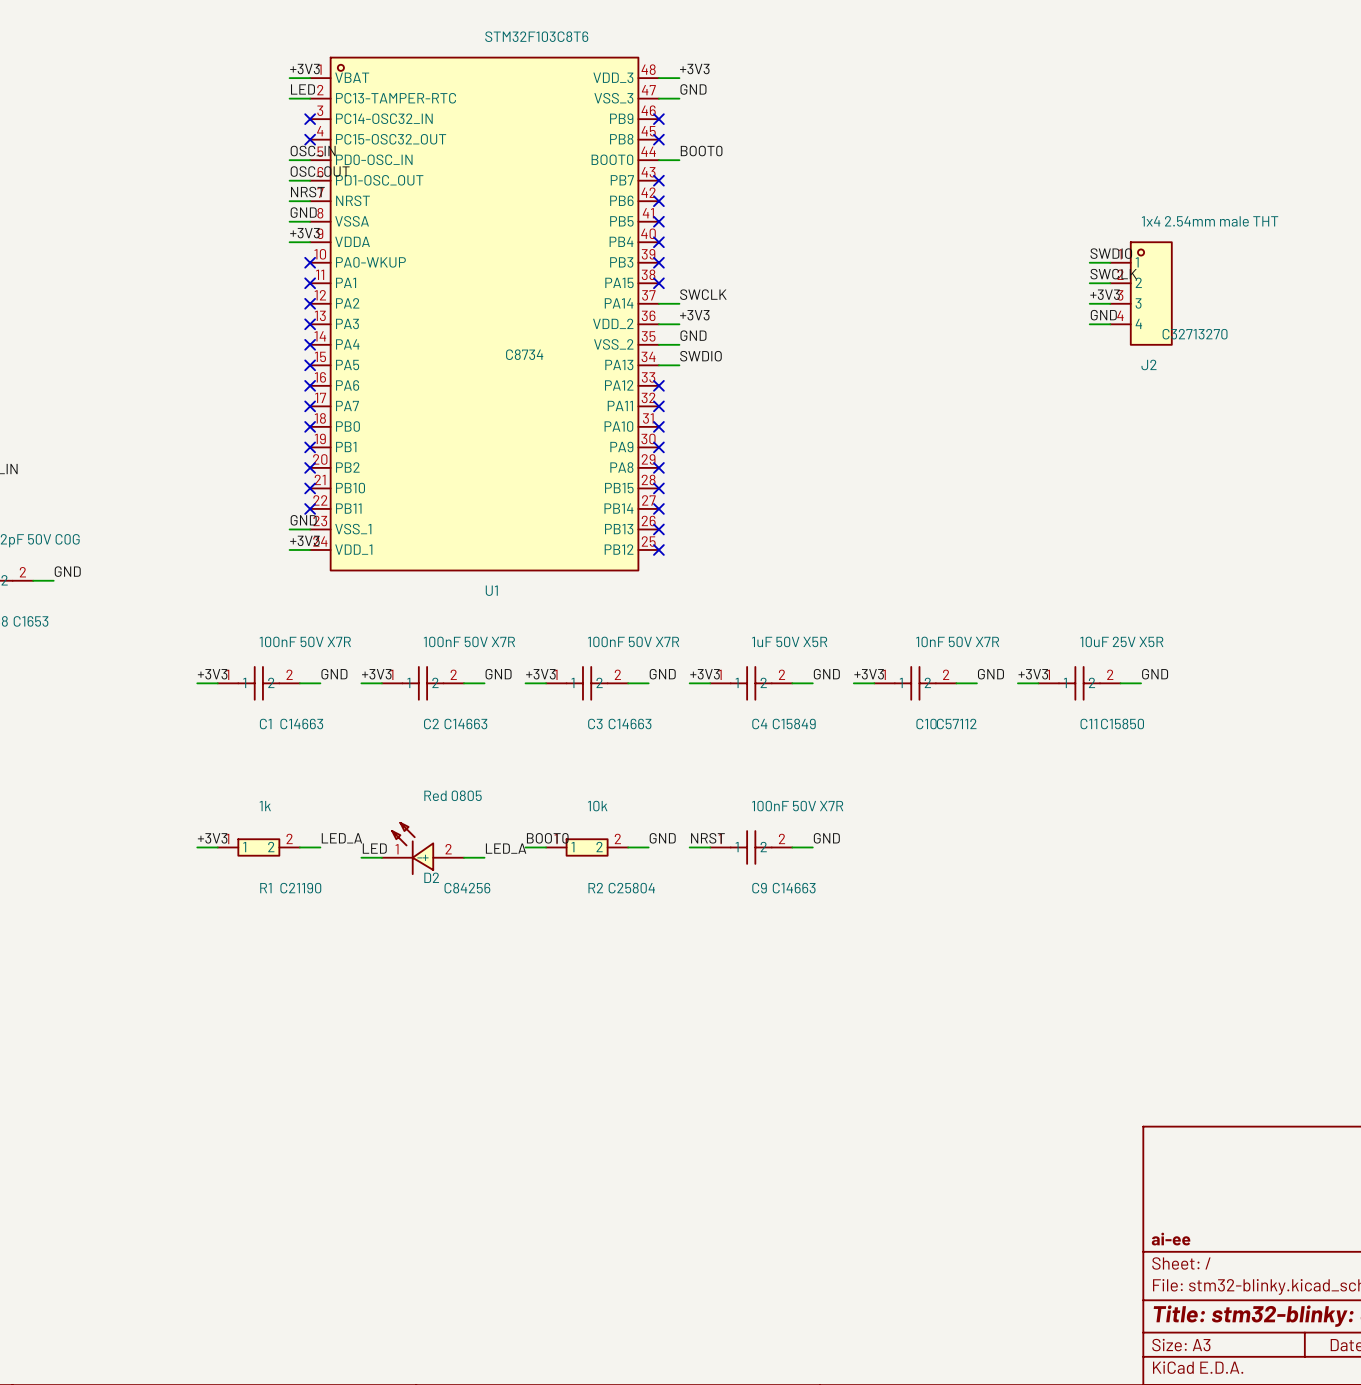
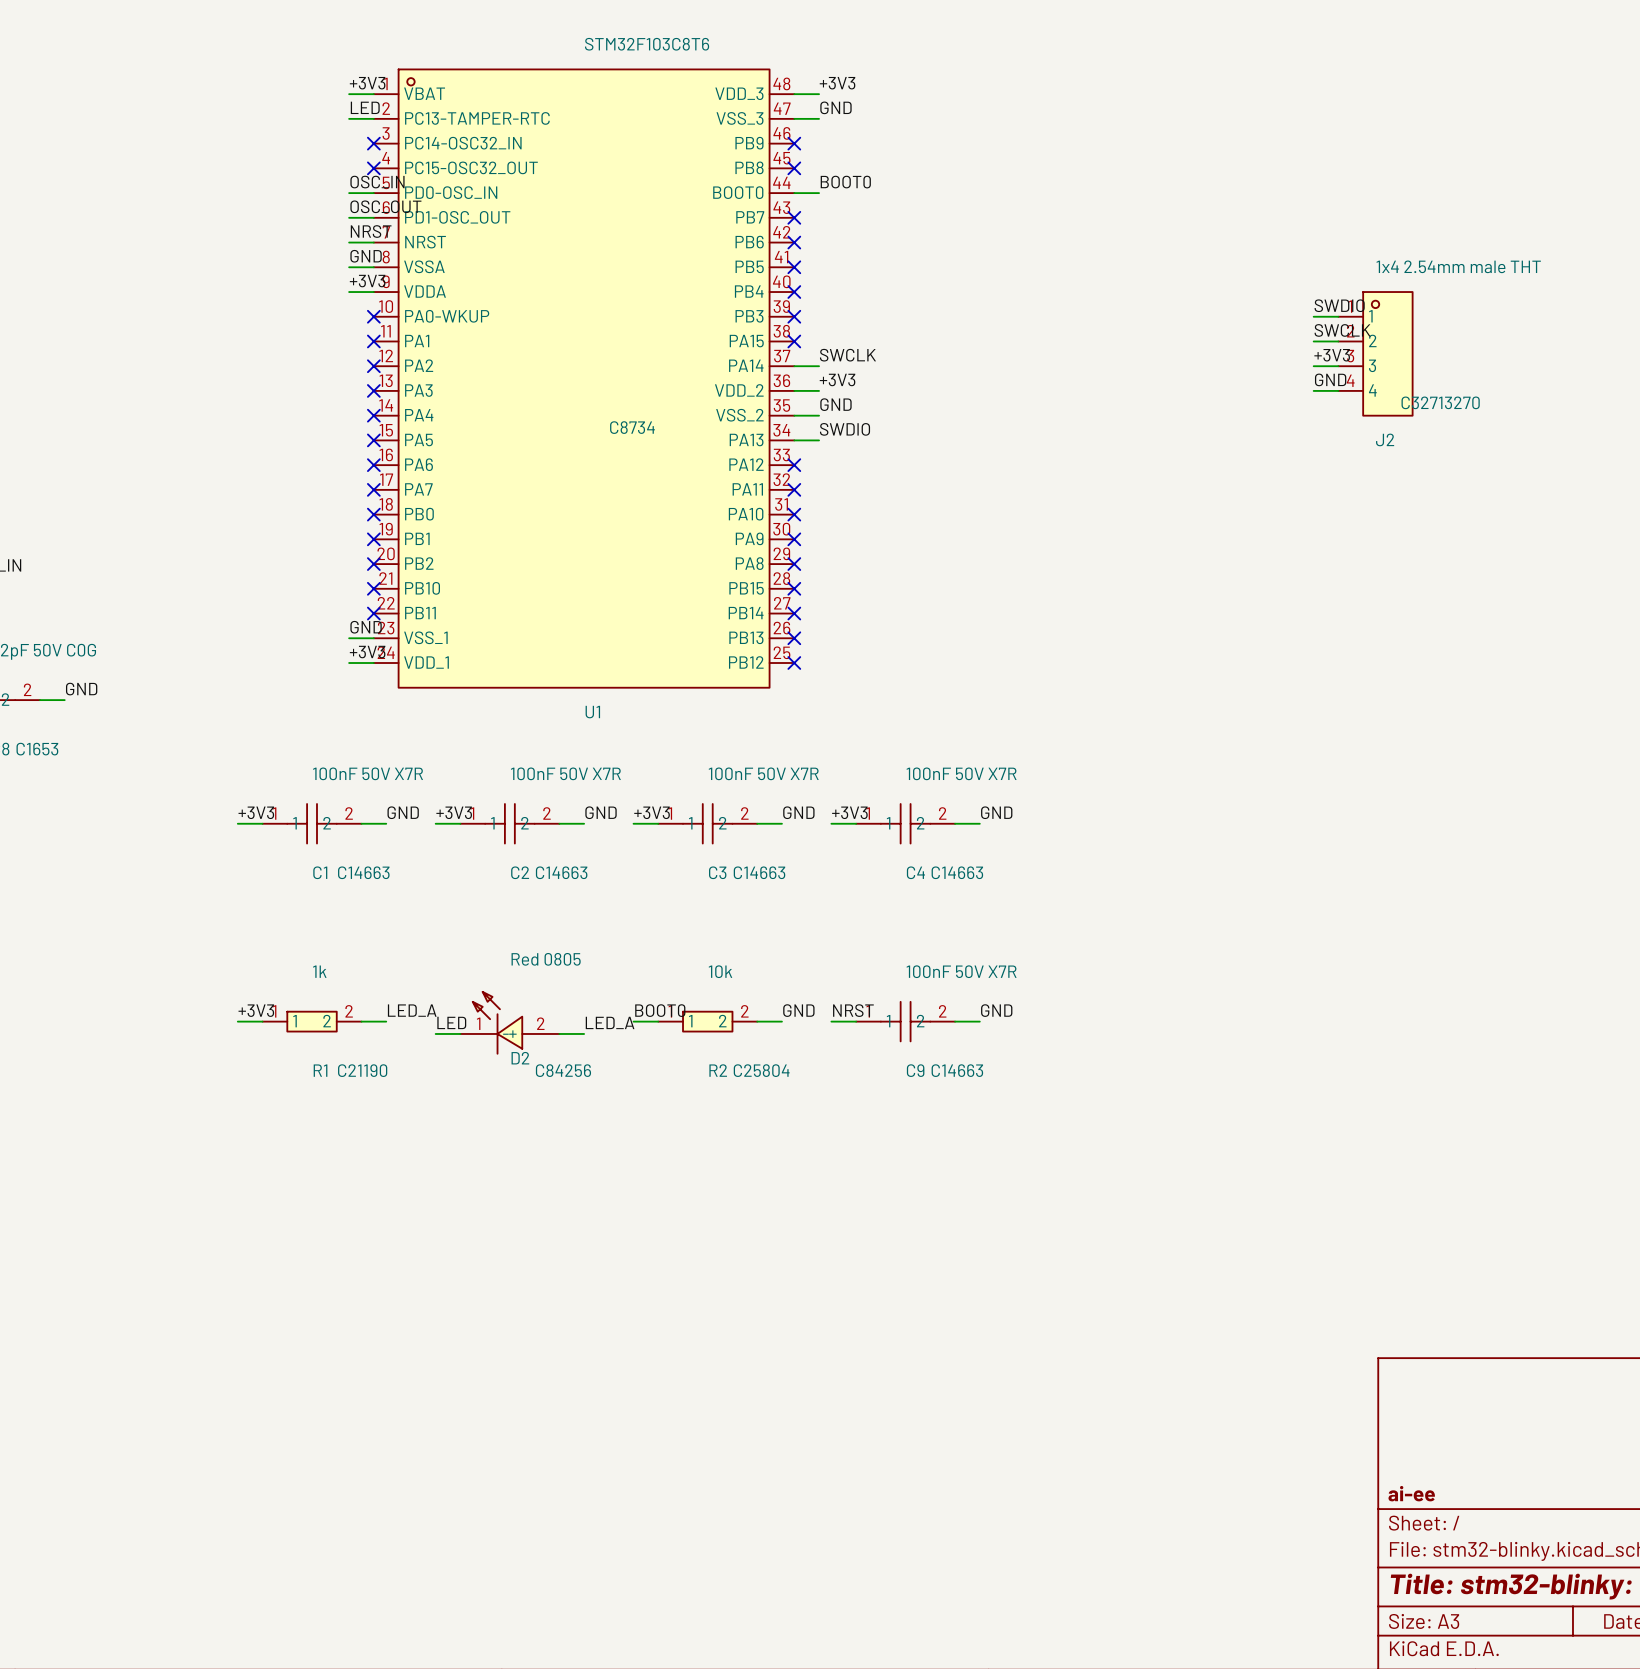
C4 value: 1uF 50V X5R (789, 641) -> 100nF 50V X7R (961, 773)
label: +3V3 (869, 674) -> none
label: GND (990, 674) -> none
label: +3V3 (1033, 674) -> none
label: GND (1155, 674) -> none
wire: (853, 683) (874, 683) -> none
C10: 10nF 50V X7R (915, 683) -> none
wire: (956, 683) (976, 683) -> none
wire: (1017, 683) (1038, 683) -> none
C11: 10uF 25V X5R (1079, 683) -> none
wire: (1120, 683) (1141, 683) -> none
C4 text: C15849 (794, 723) -> C14663 (957, 872)

